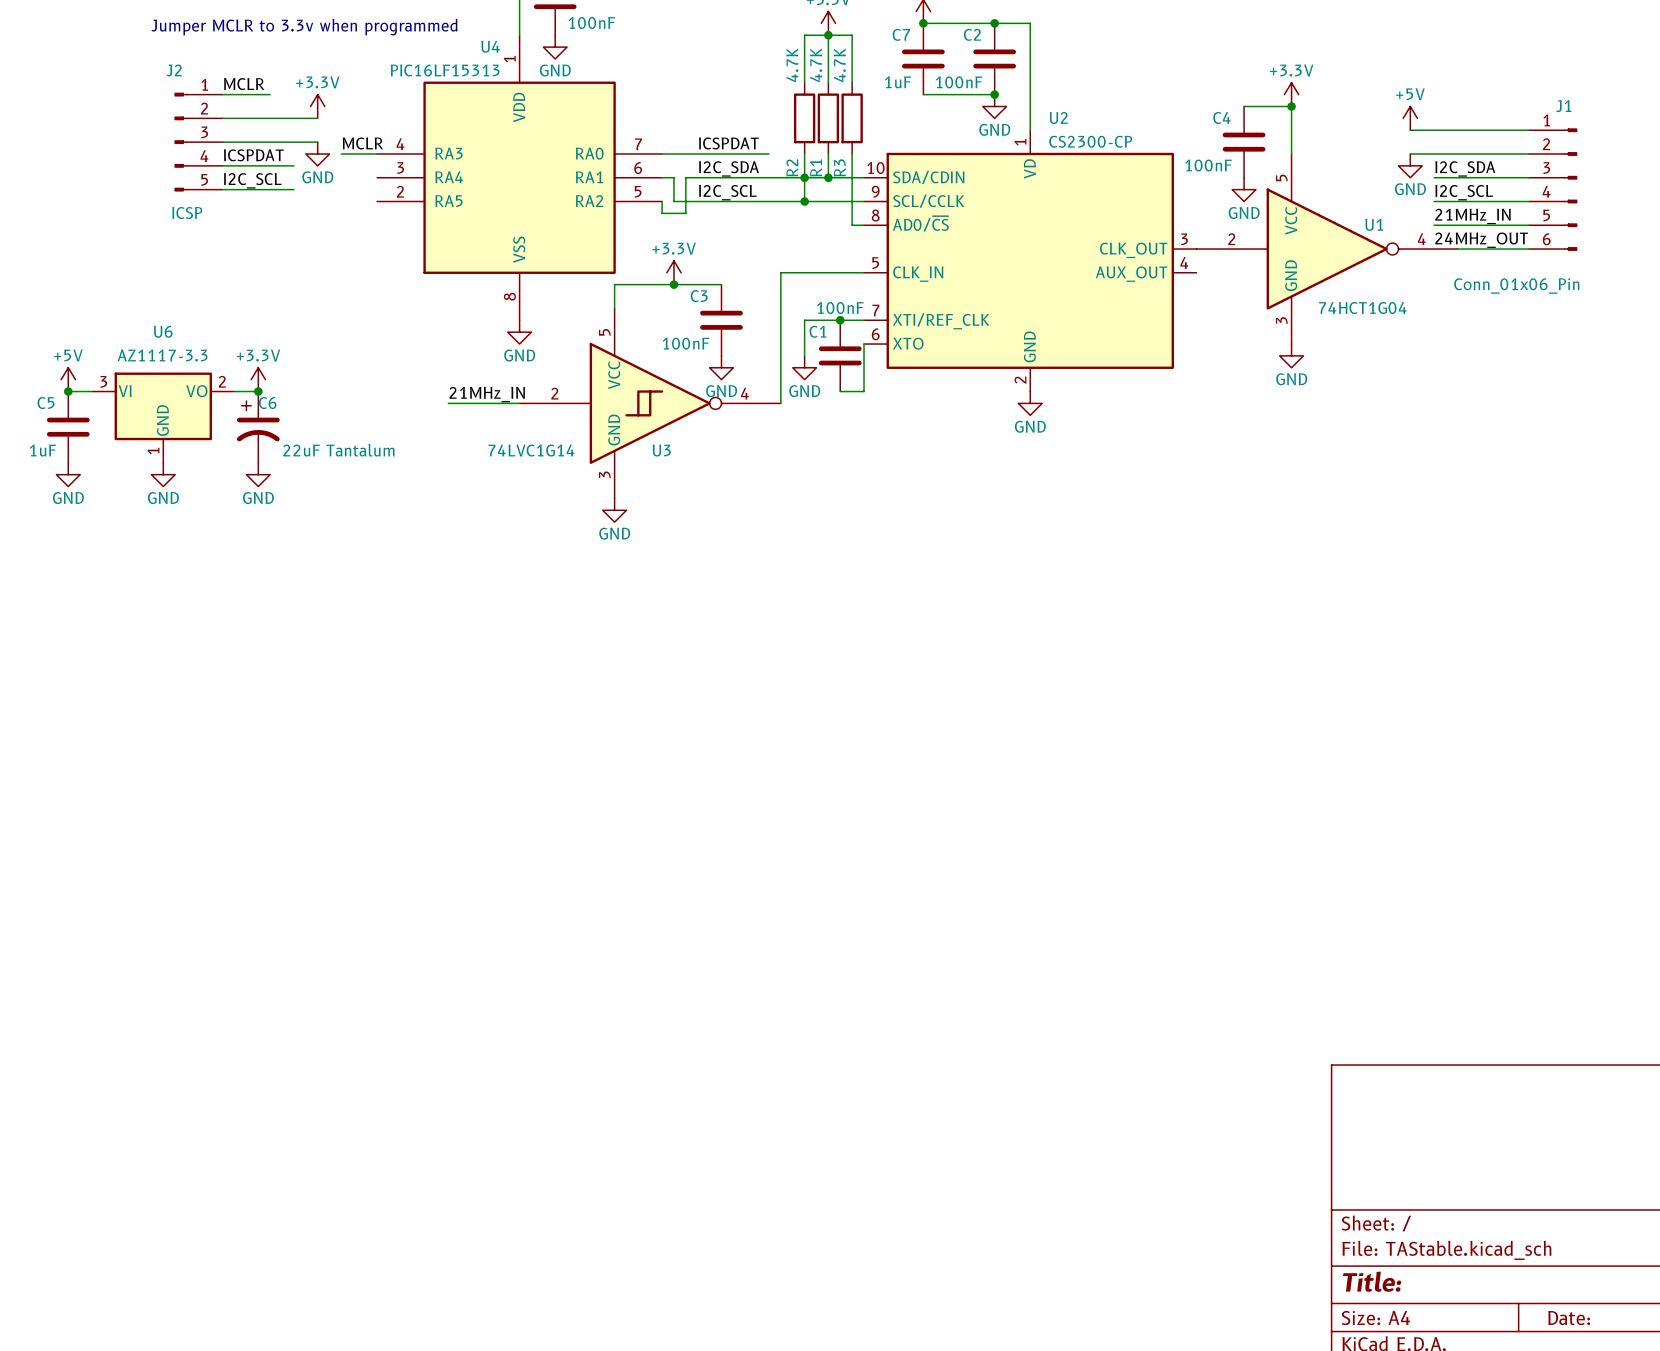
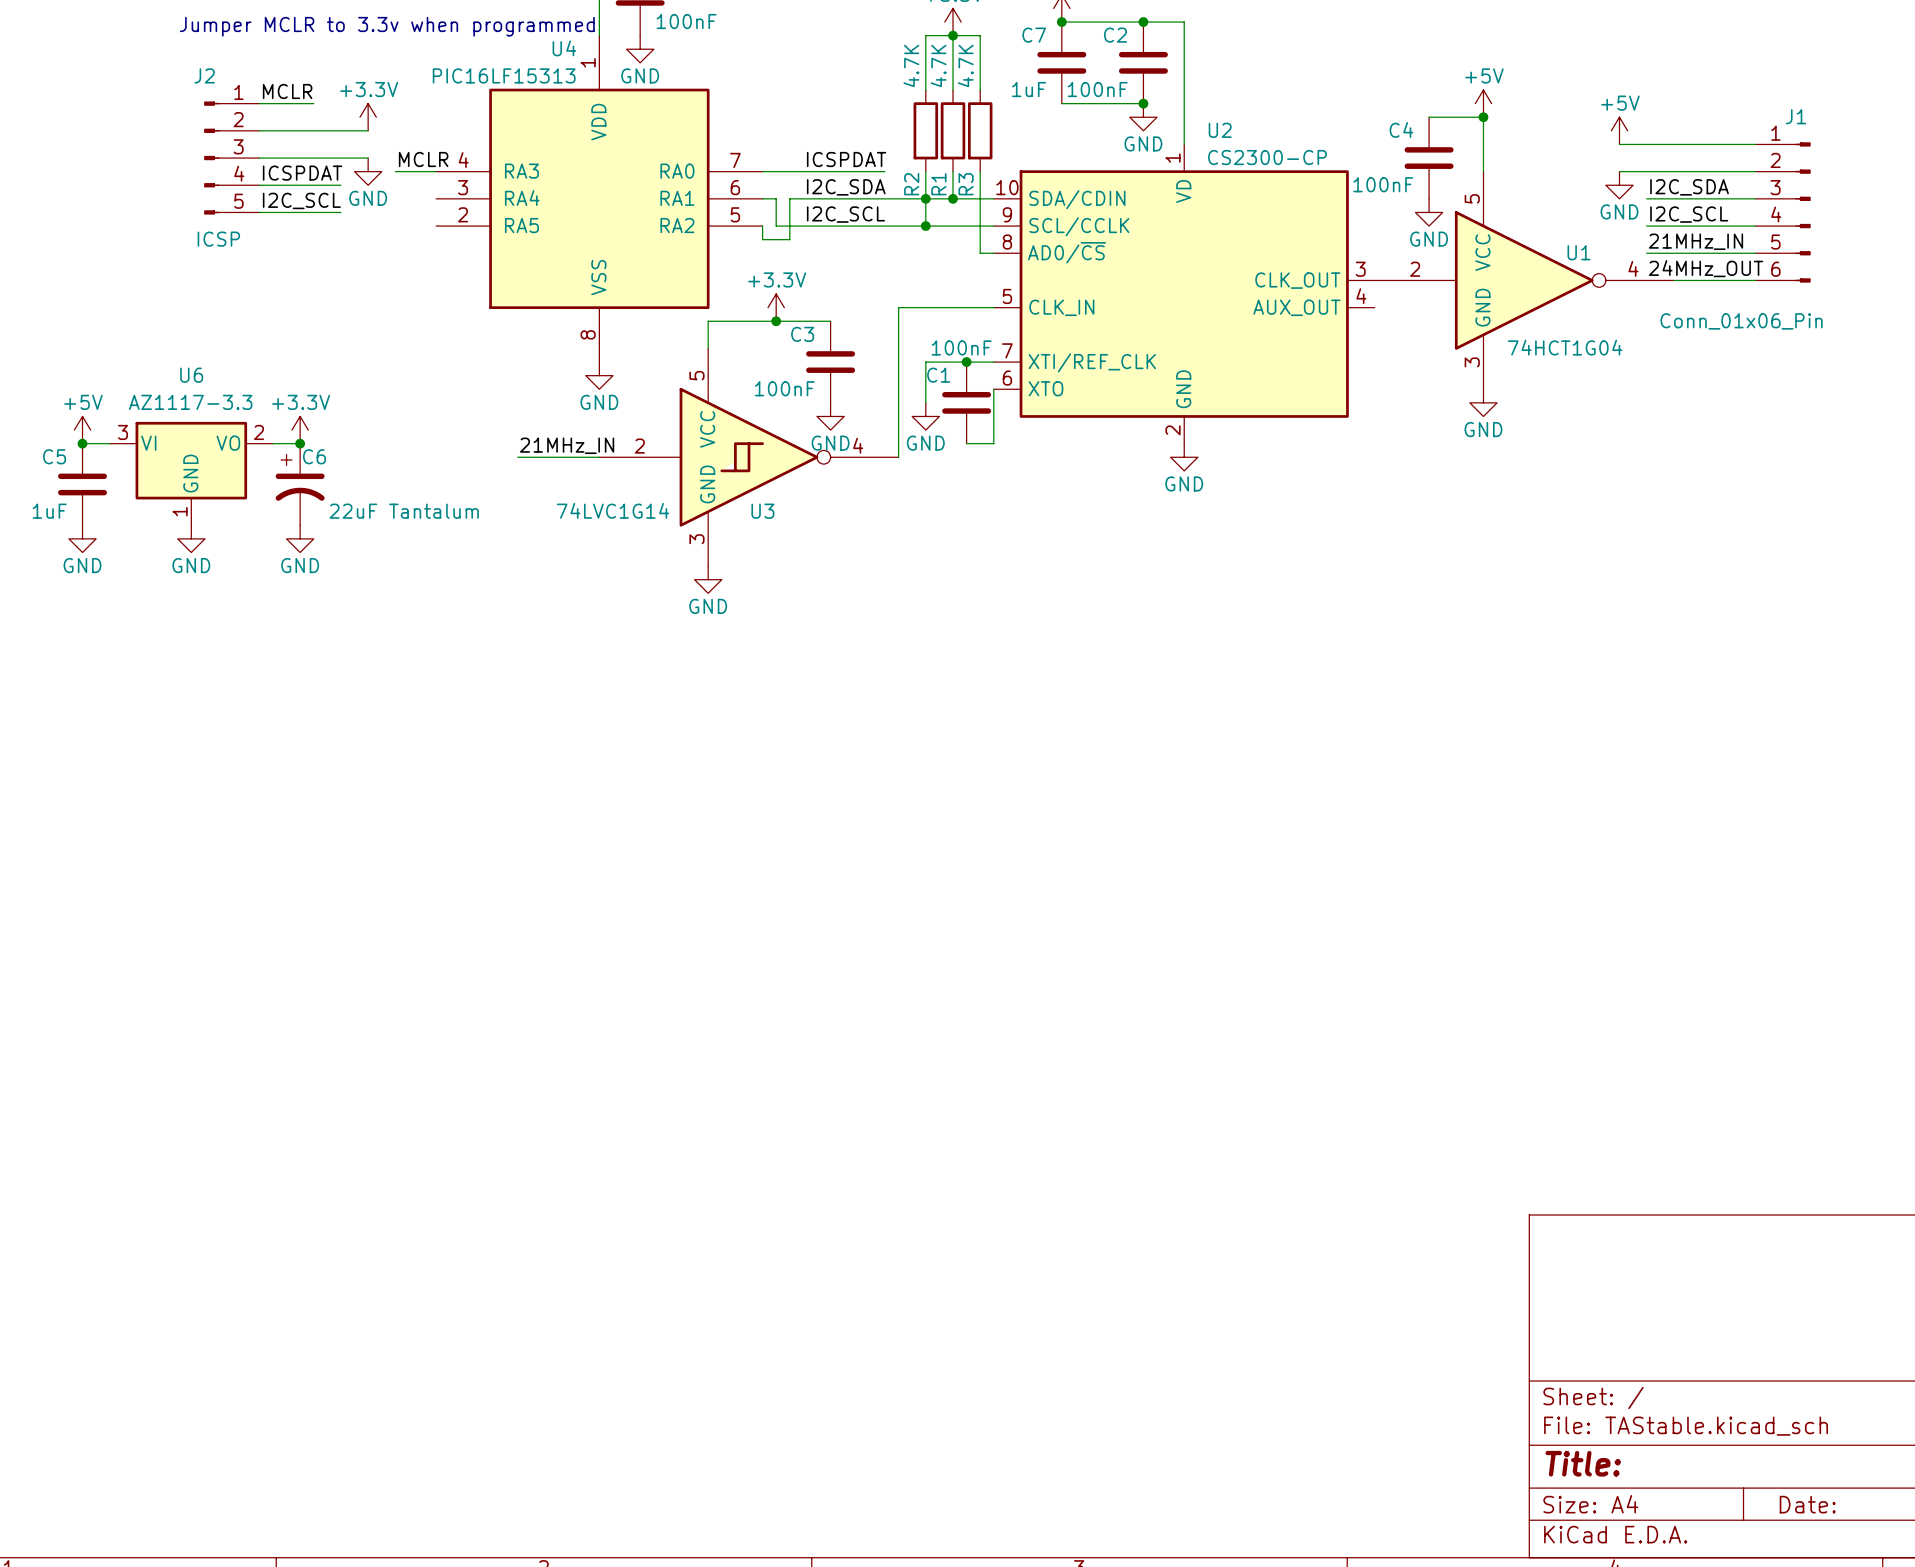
power symbol: +3.3V (1291, 94) -> +5V (1483, 103)

